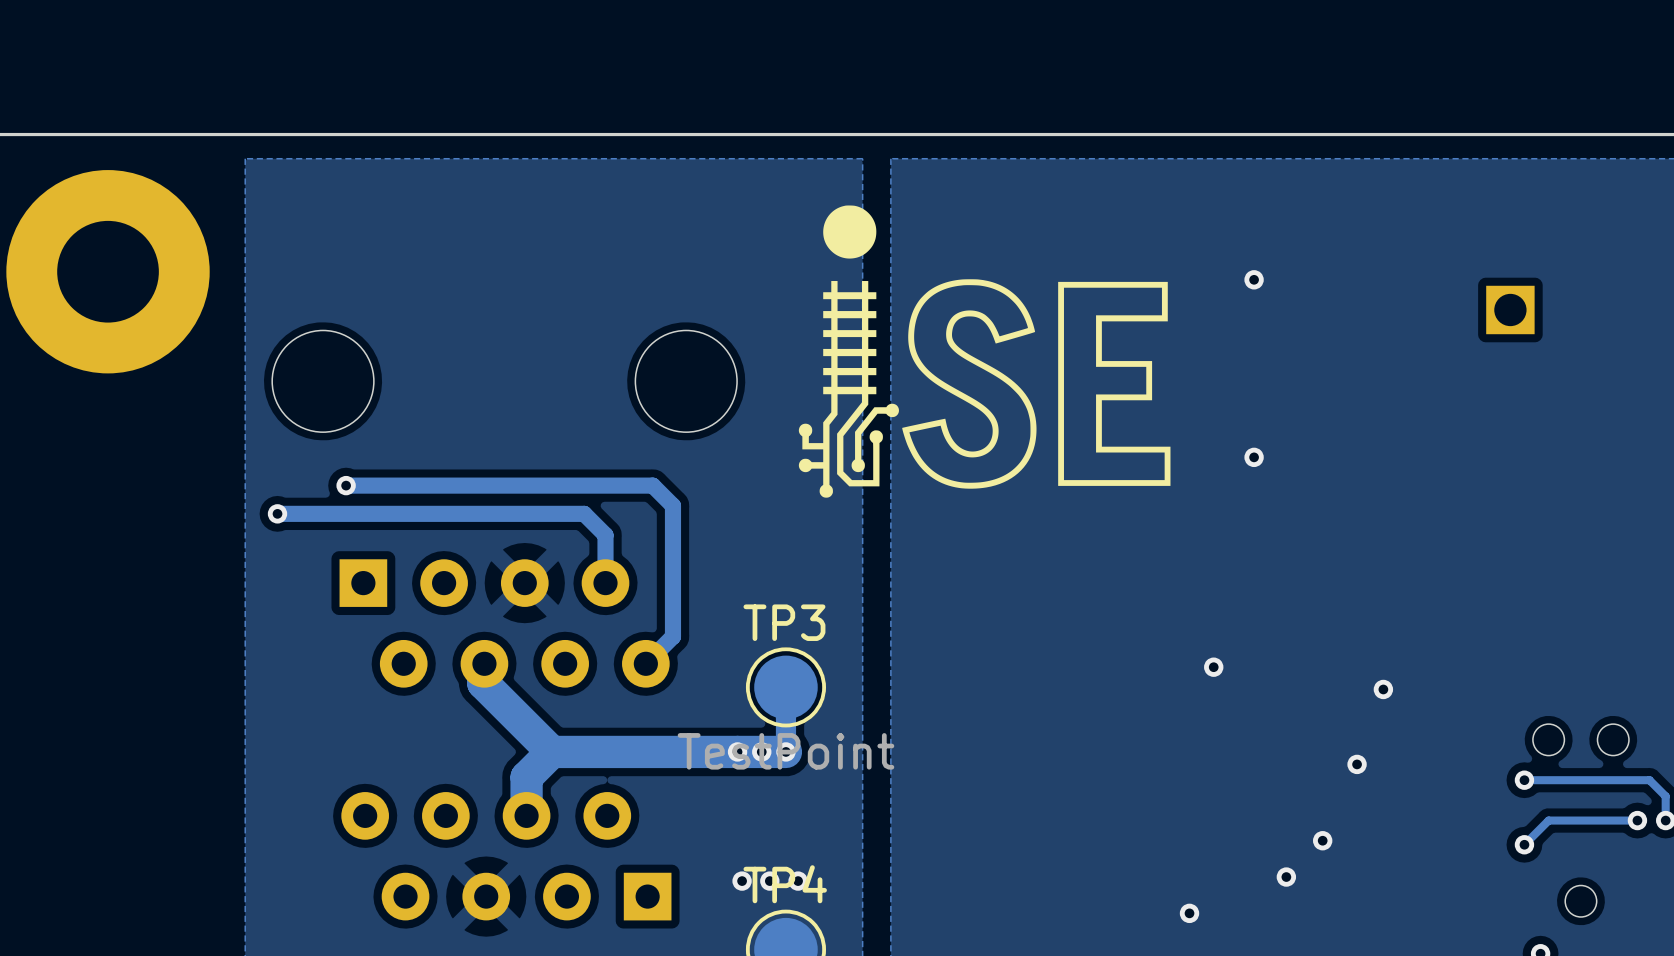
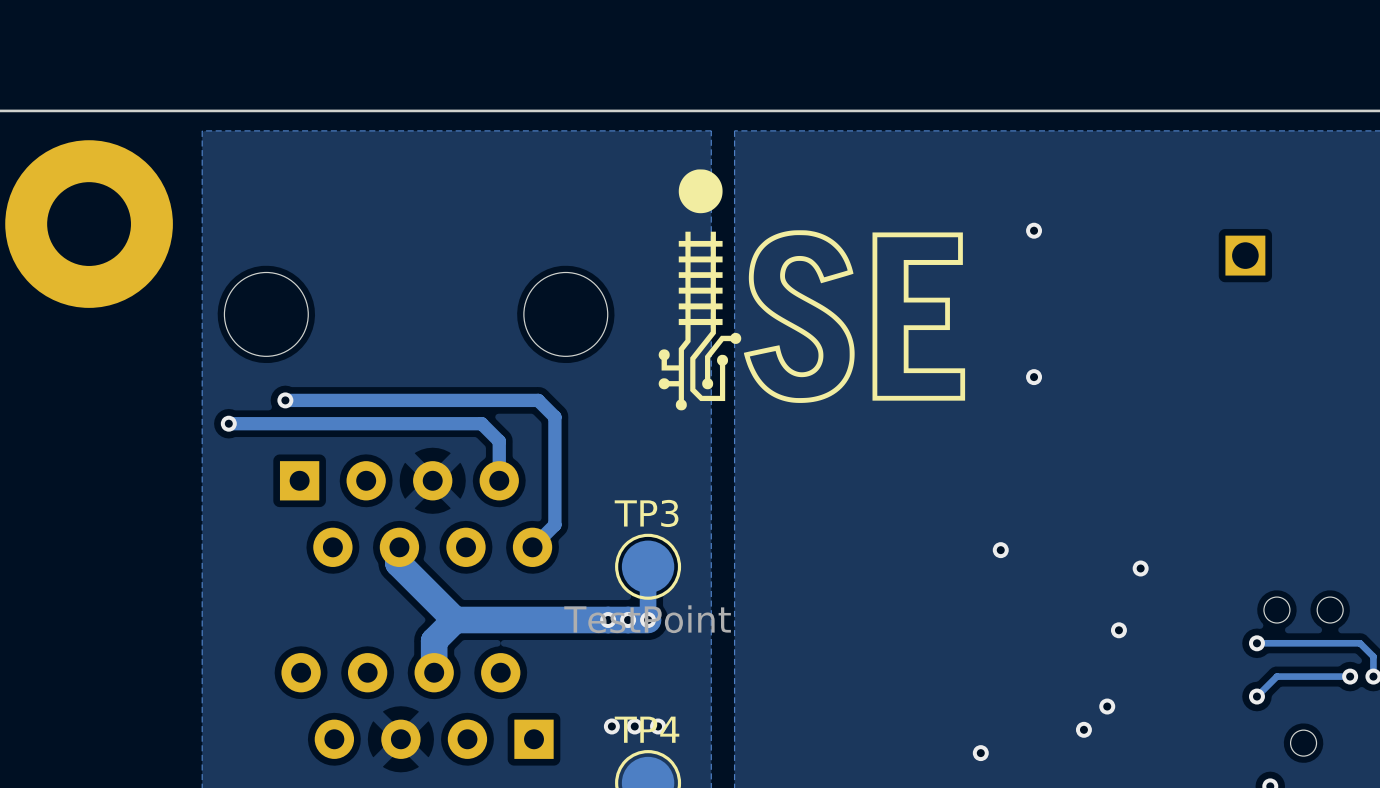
via: (1322, 840) -> none
via: none -> (1107, 706)
via: (1286, 877) -> none
via: none -> (1083, 729)

